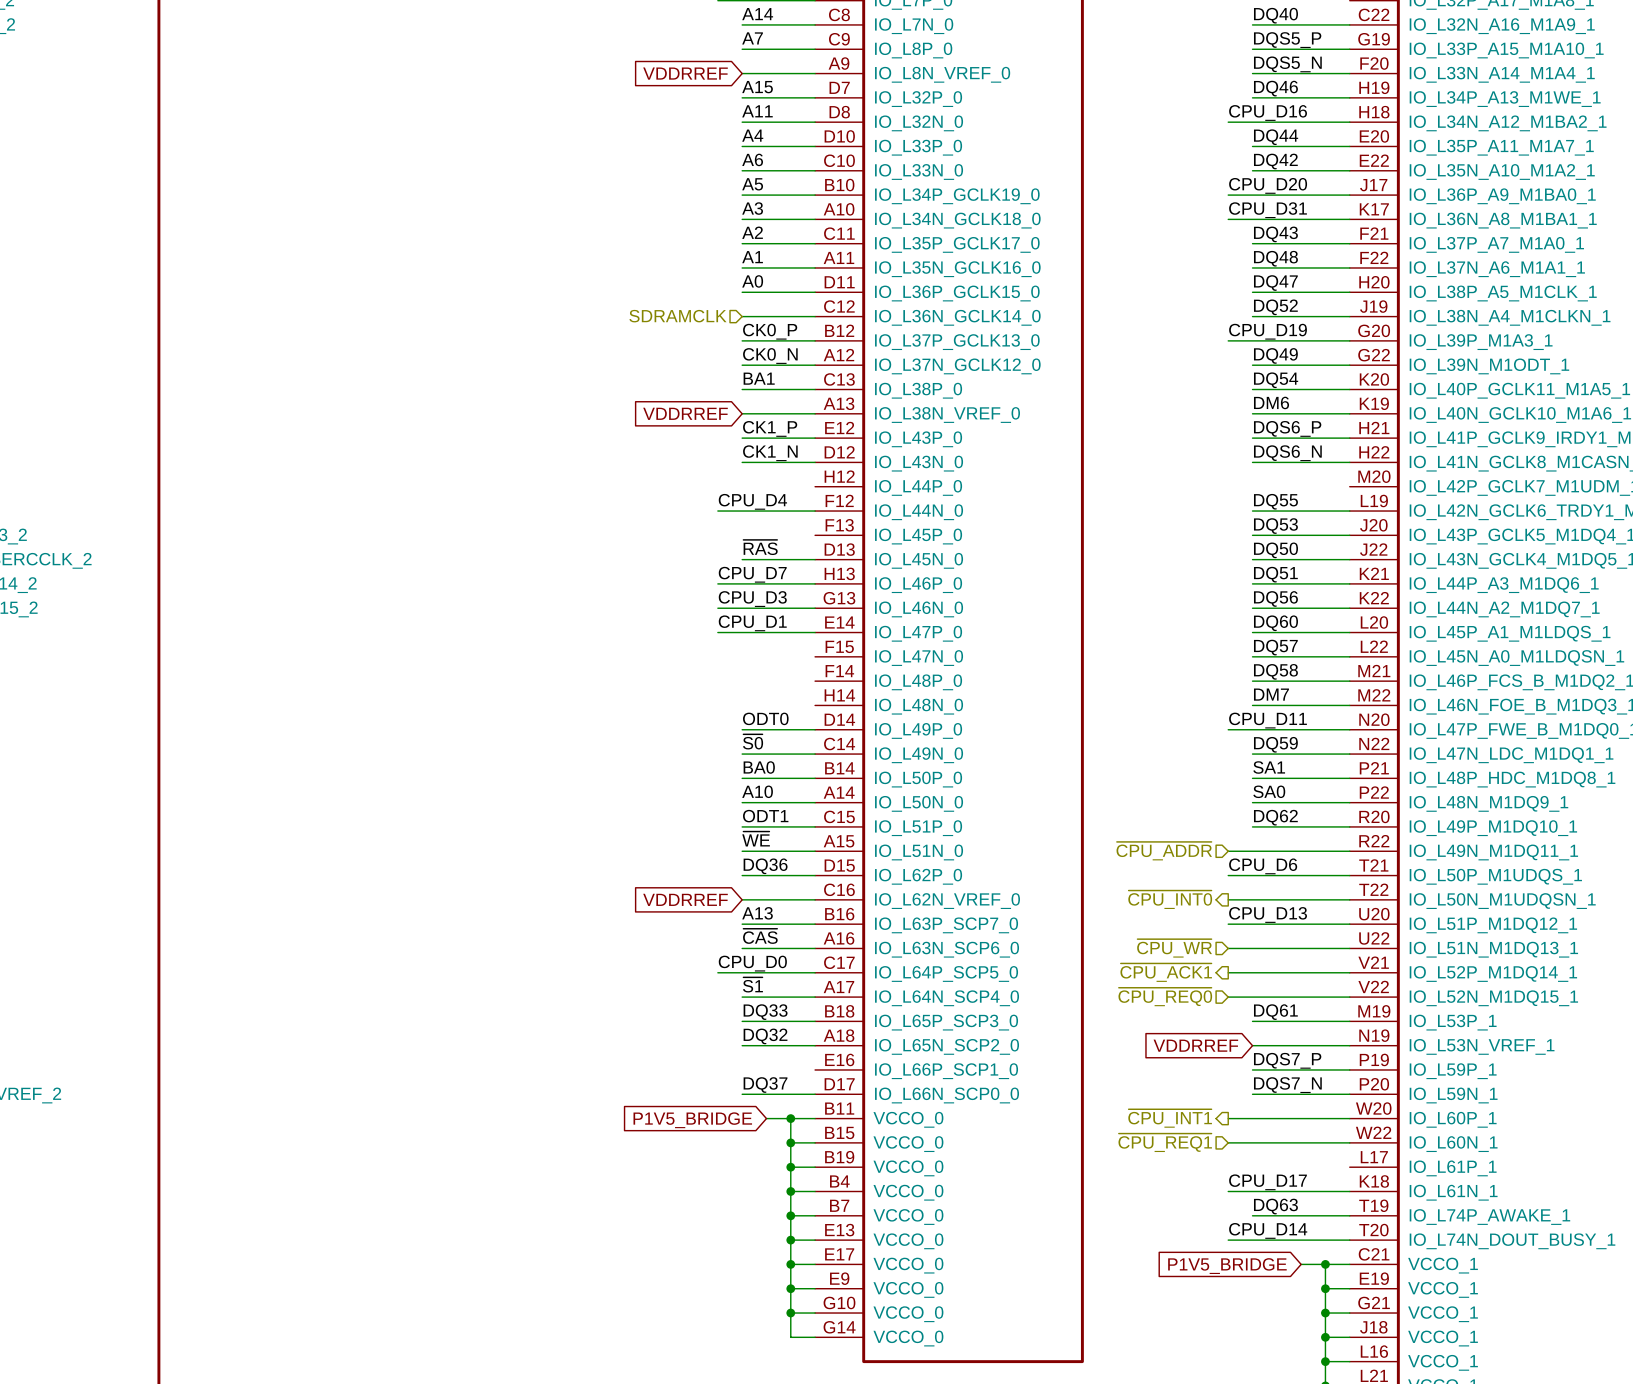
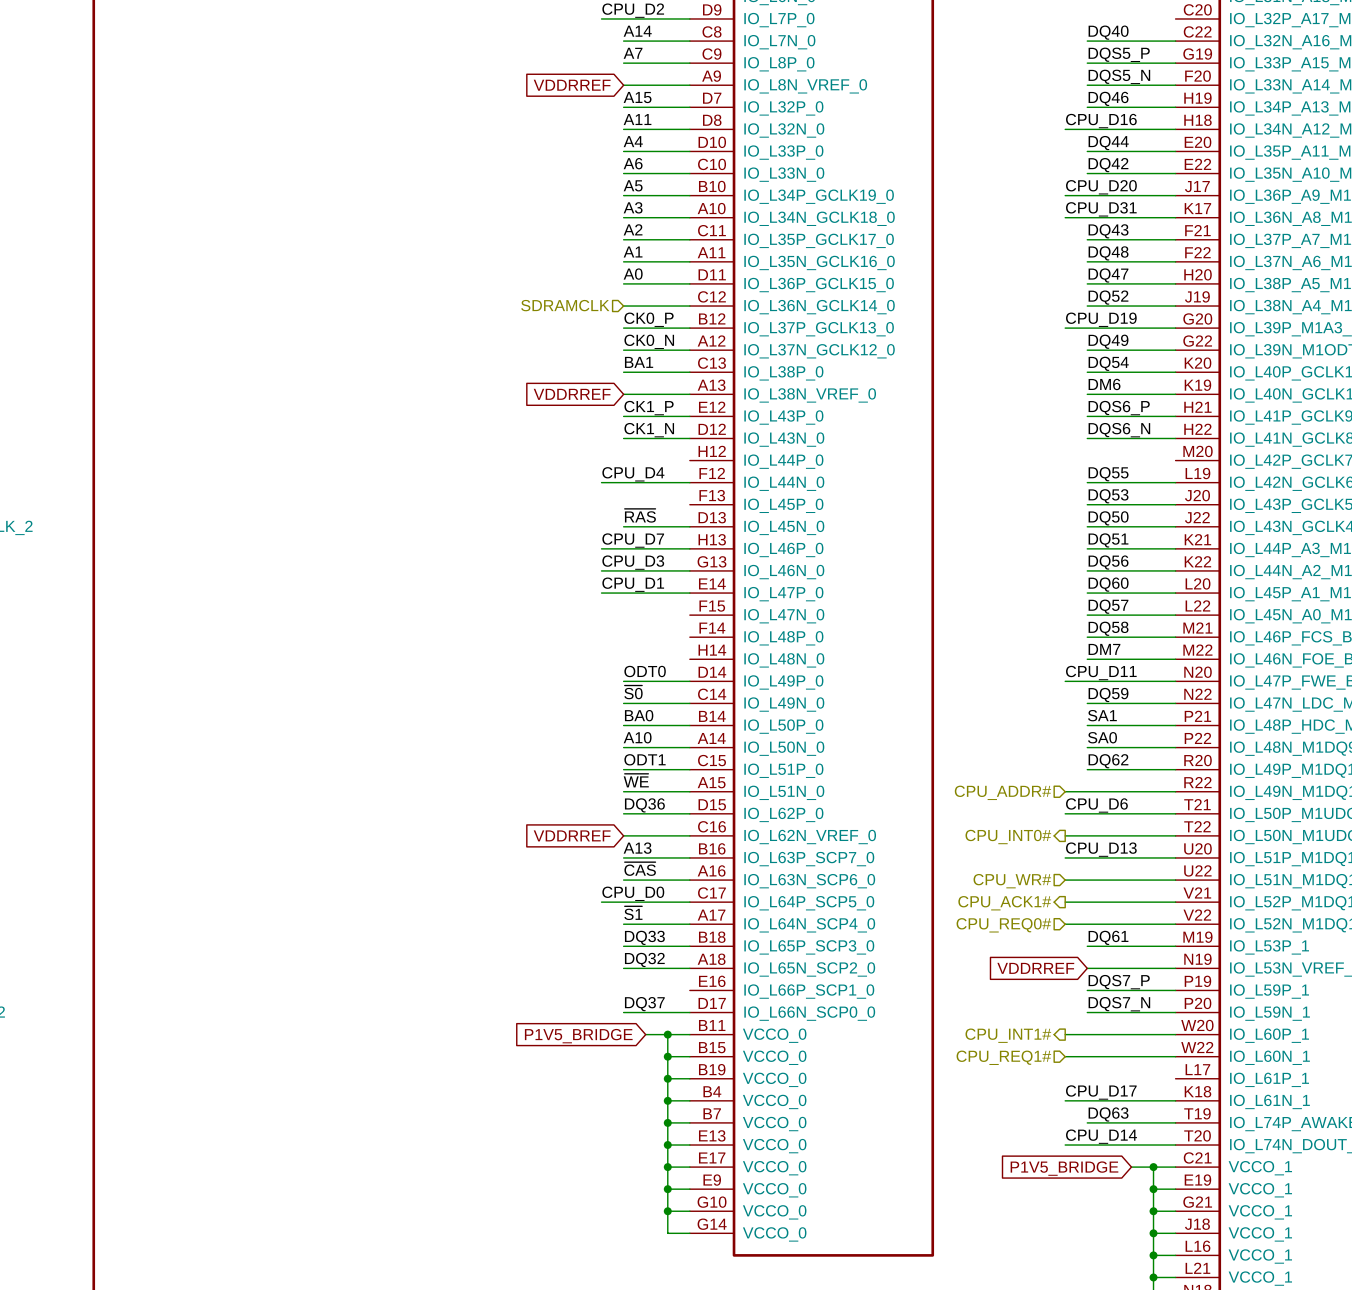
hierarchical label: ~{CPU_ADDR} (1164, 851) -> CPU_ADDR# (1002, 792)
hierarchical label: ~{CPU_INT0} (1170, 899) -> CPU_INT0# (1008, 837)
hierarchical label: ~{CPU_WR} (1174, 948) -> CPU_WR# (1012, 881)
hierarchical label: ~{CPU_ACK1} (1166, 972) -> CPU_ACK1# (1004, 903)
hierarchical label: ~{CPU_REQ0} (1165, 996) -> CPU_REQ0# (1003, 925)
hierarchical label: ~{CPU_INT1} (1170, 1118) -> CPU_INT1# (1008, 1035)
hierarchical label: ~{CPU_REQ1} (1165, 1142) -> CPU_REQ1# (1003, 1057)

